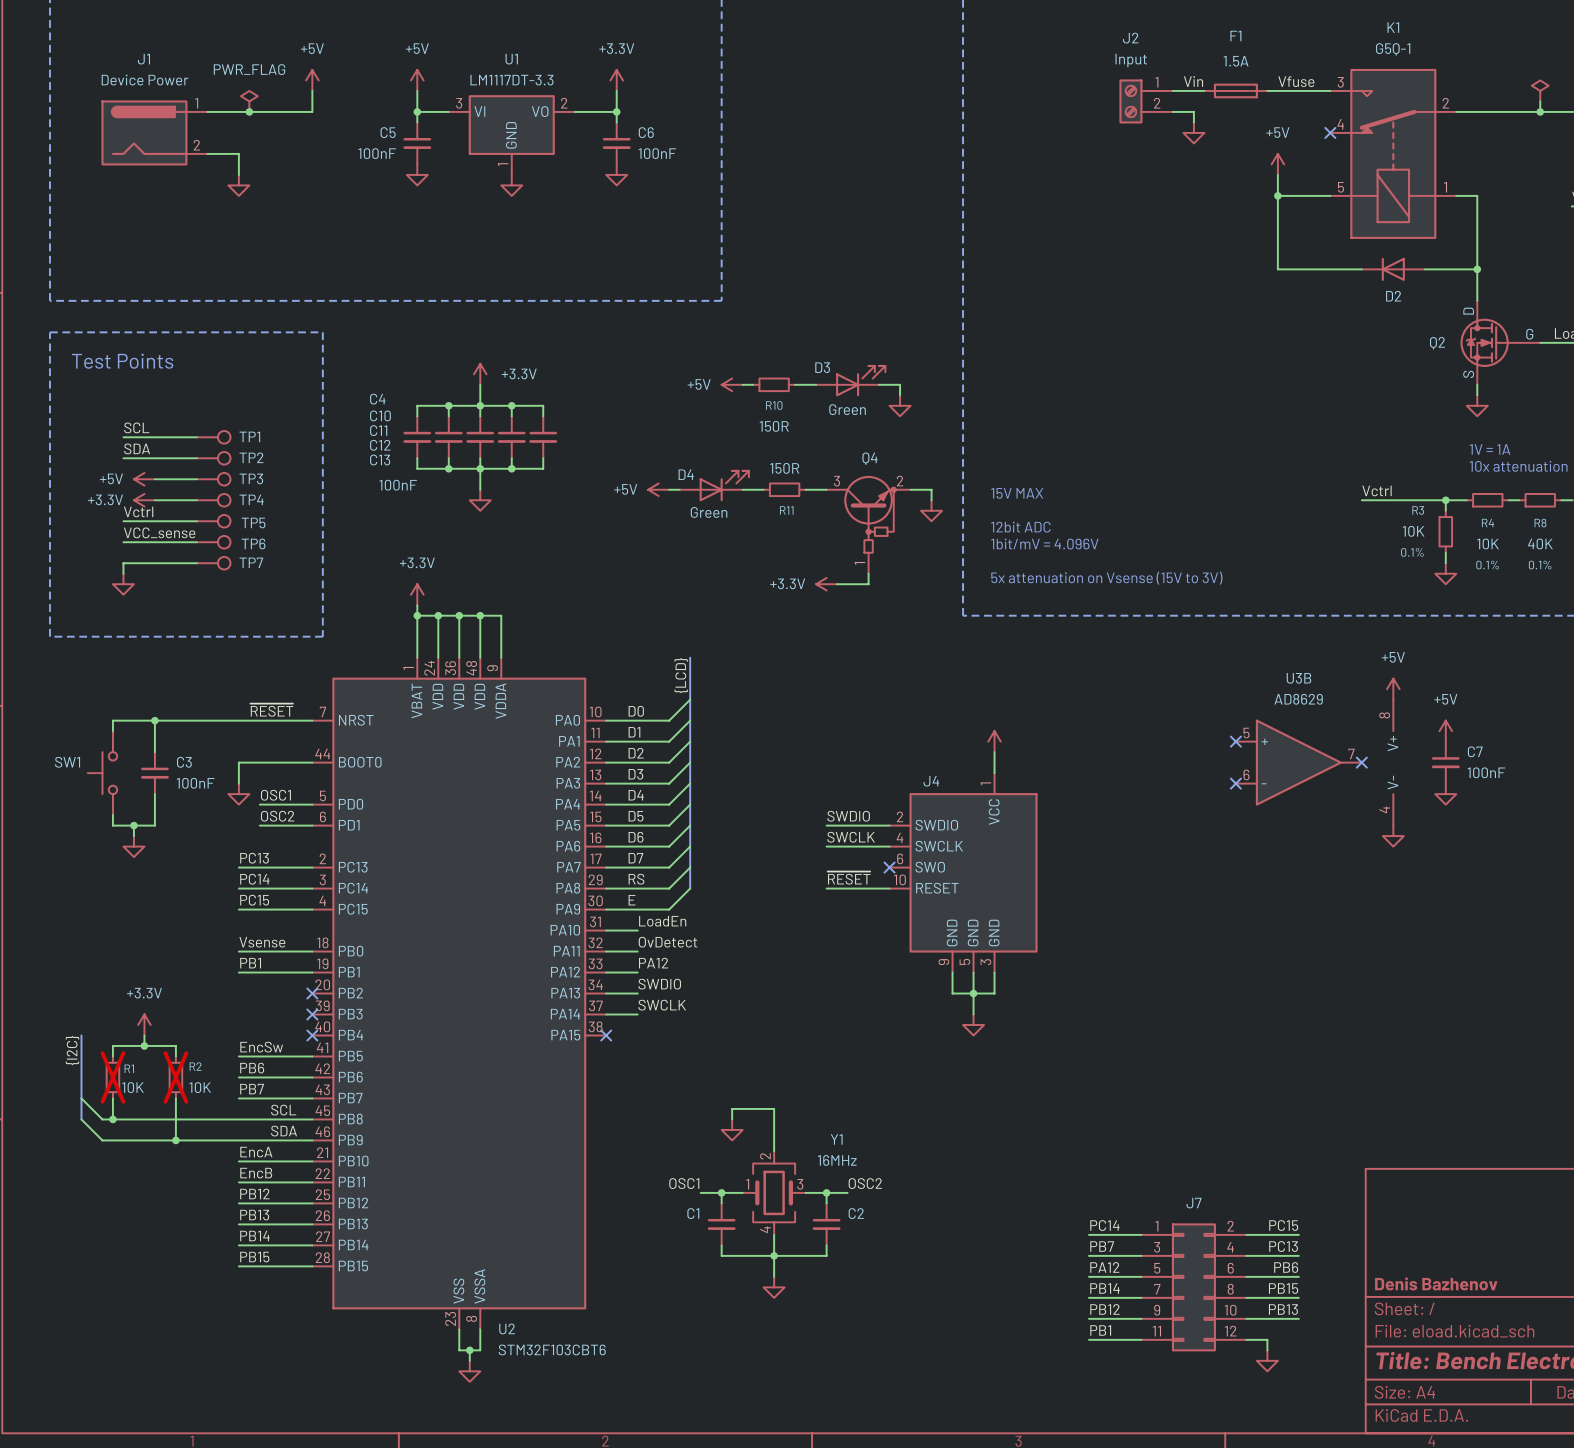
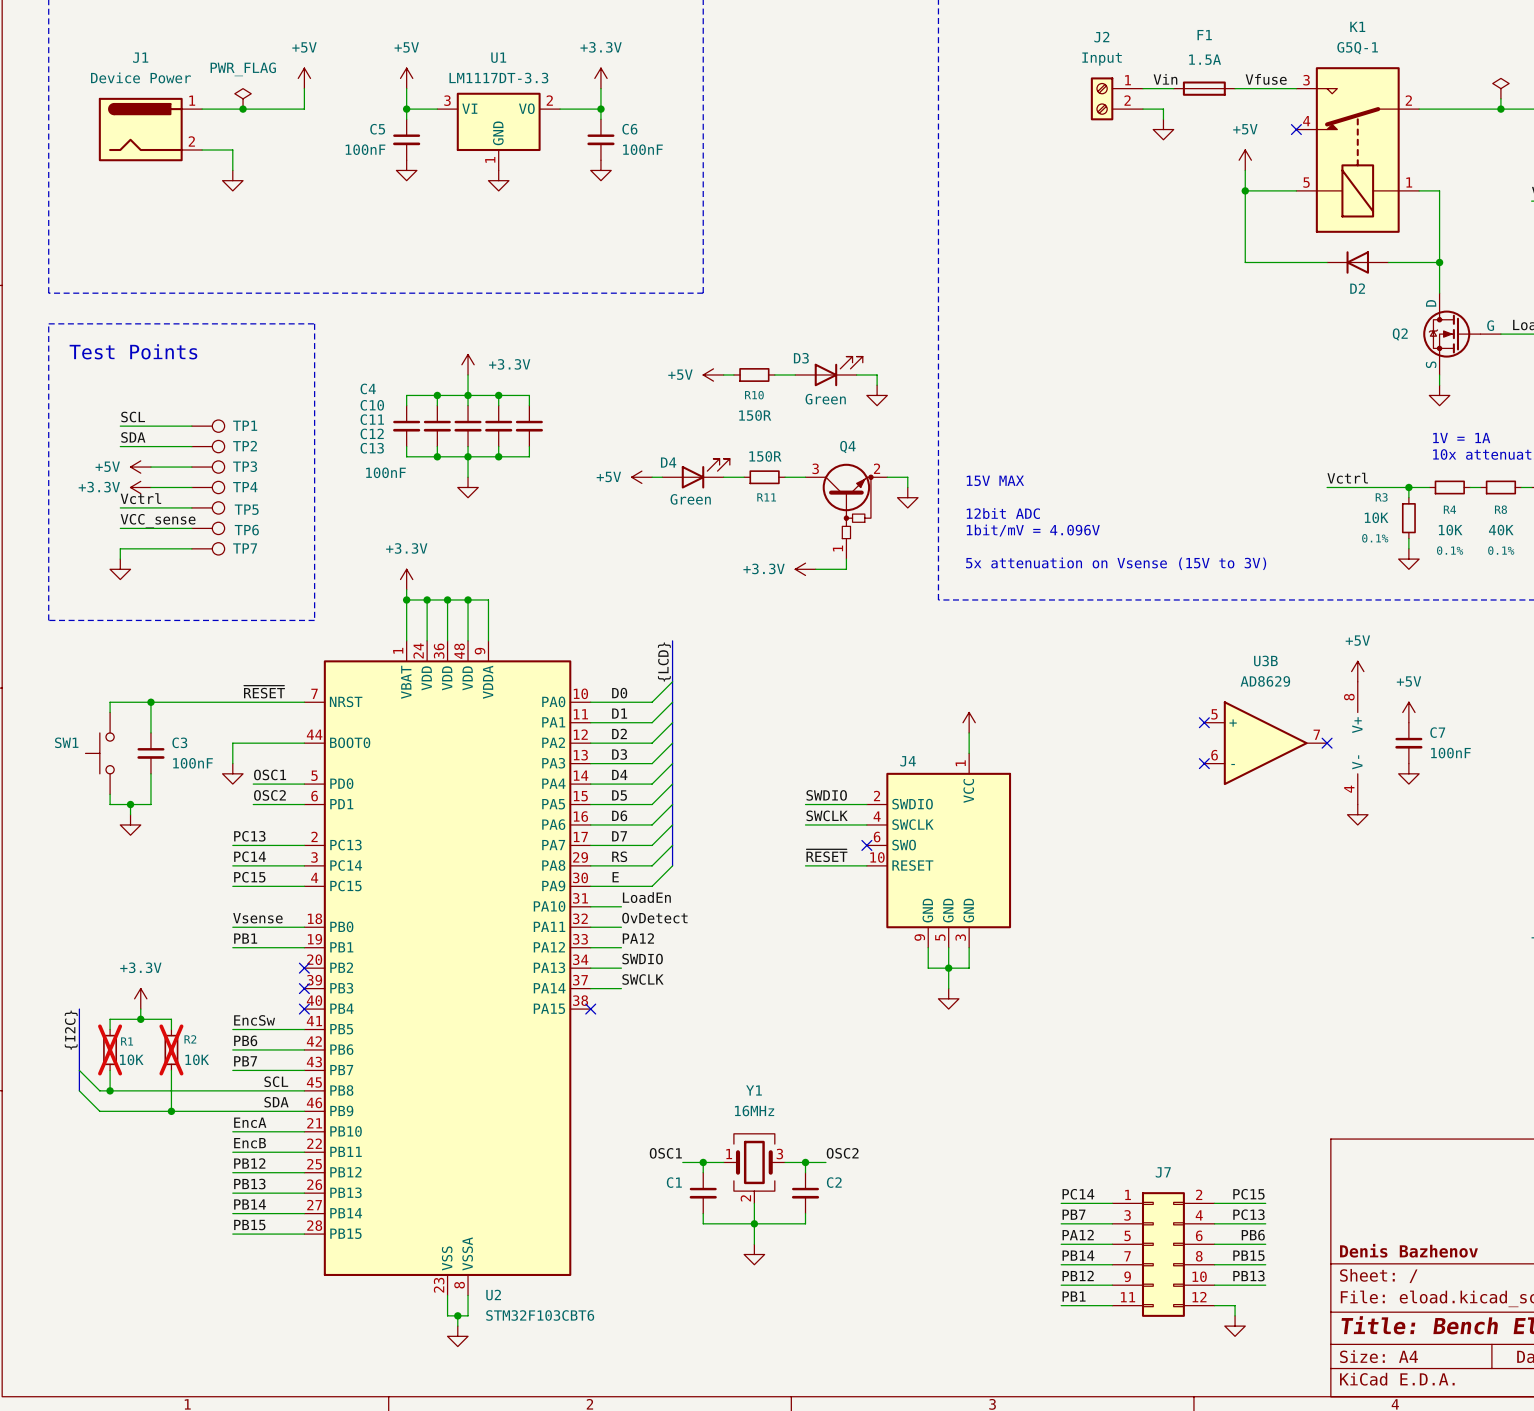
wire: (732, 1119) (732, 1108) (774, 1108) (774, 1150) -> none
power symbol: (732, 1129) -> none
Y1 name position: Y1 (836, 1139) -> Y1 (754, 1090)
Y1 symbol: [742, 1150, 806, 1235] -> [723, 1133, 786, 1204]
Y1 value position: 16MHz (837, 1160) -> 16MHz (754, 1110)

